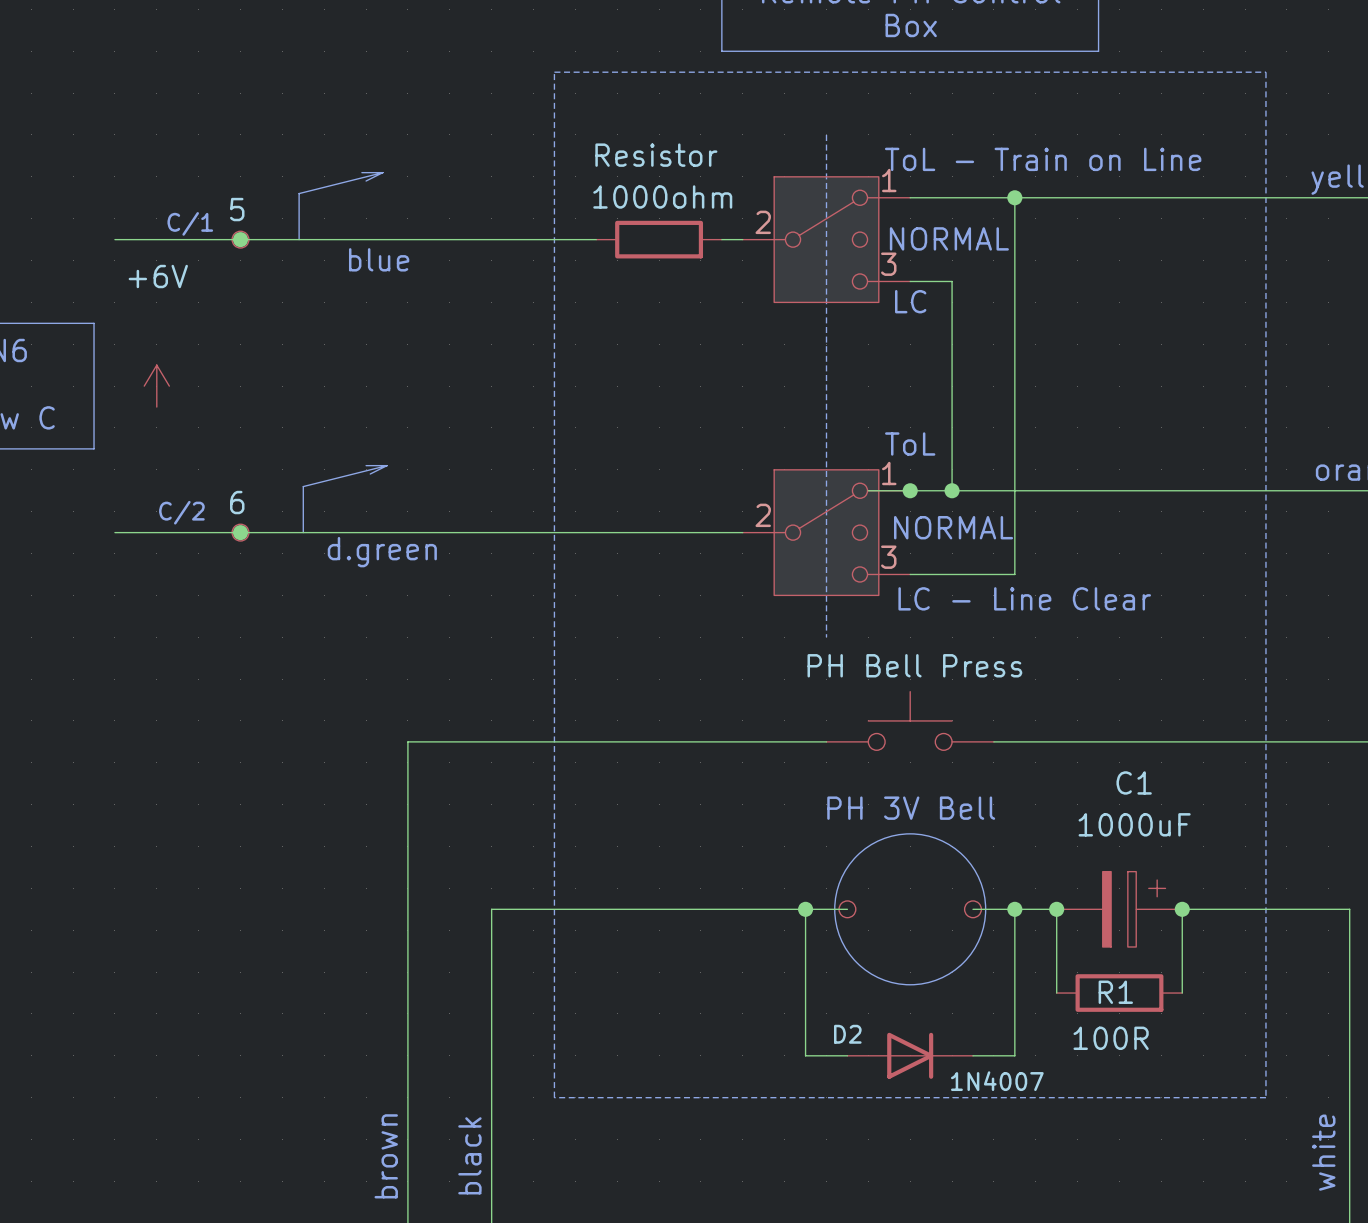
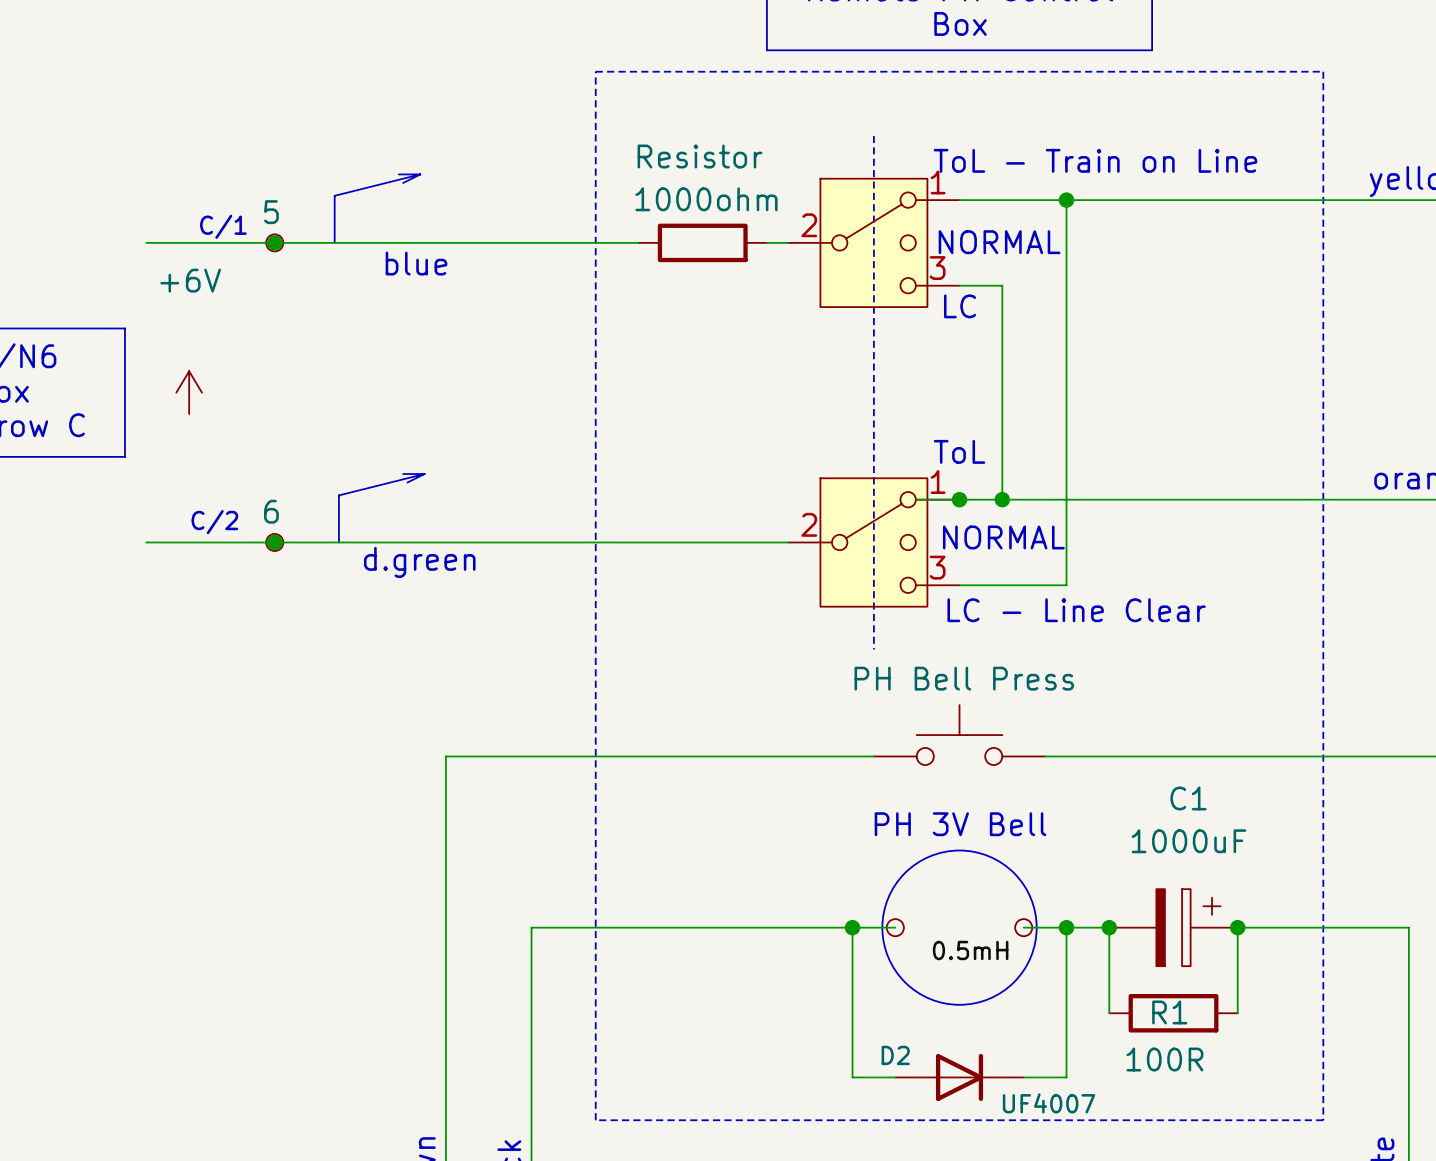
label: none -> 0.5mH (970, 950)
D2 value: 1N4007 (997, 1081) -> UF4007 (1049, 1103)

